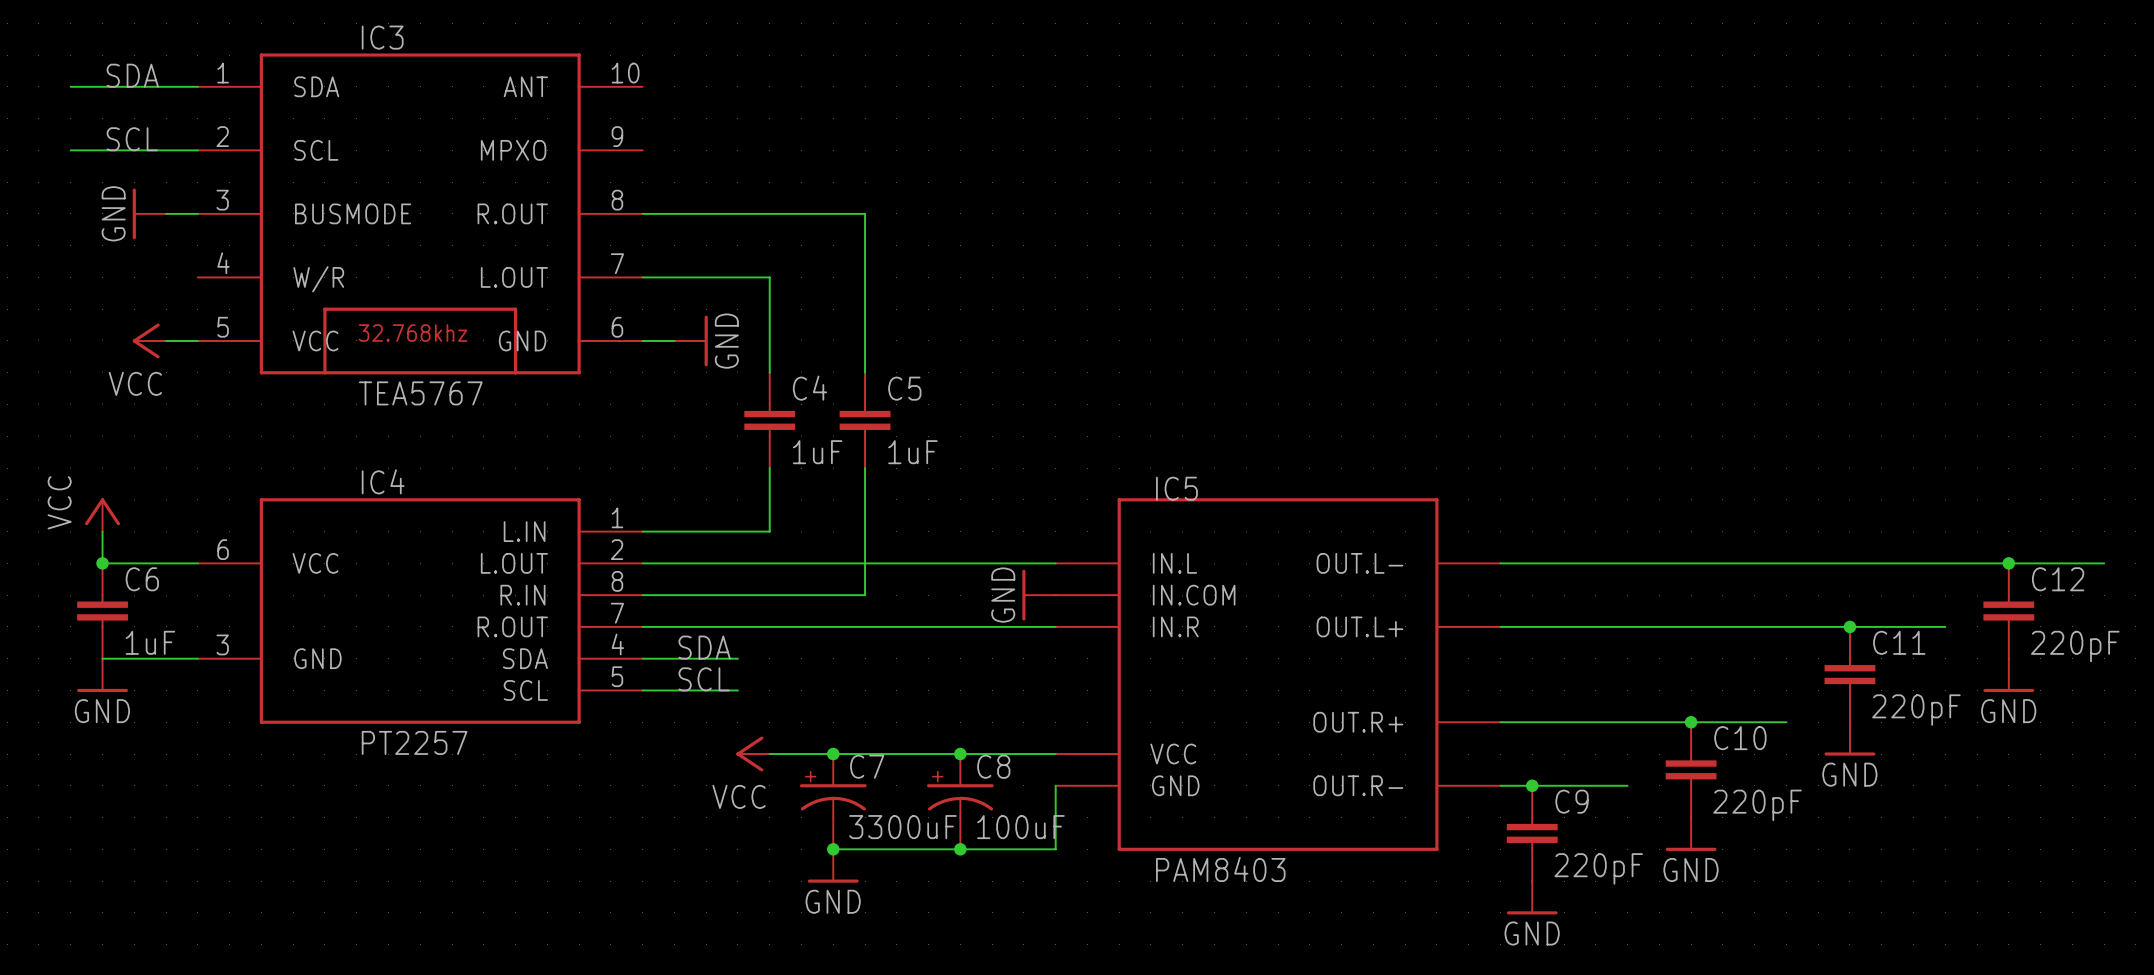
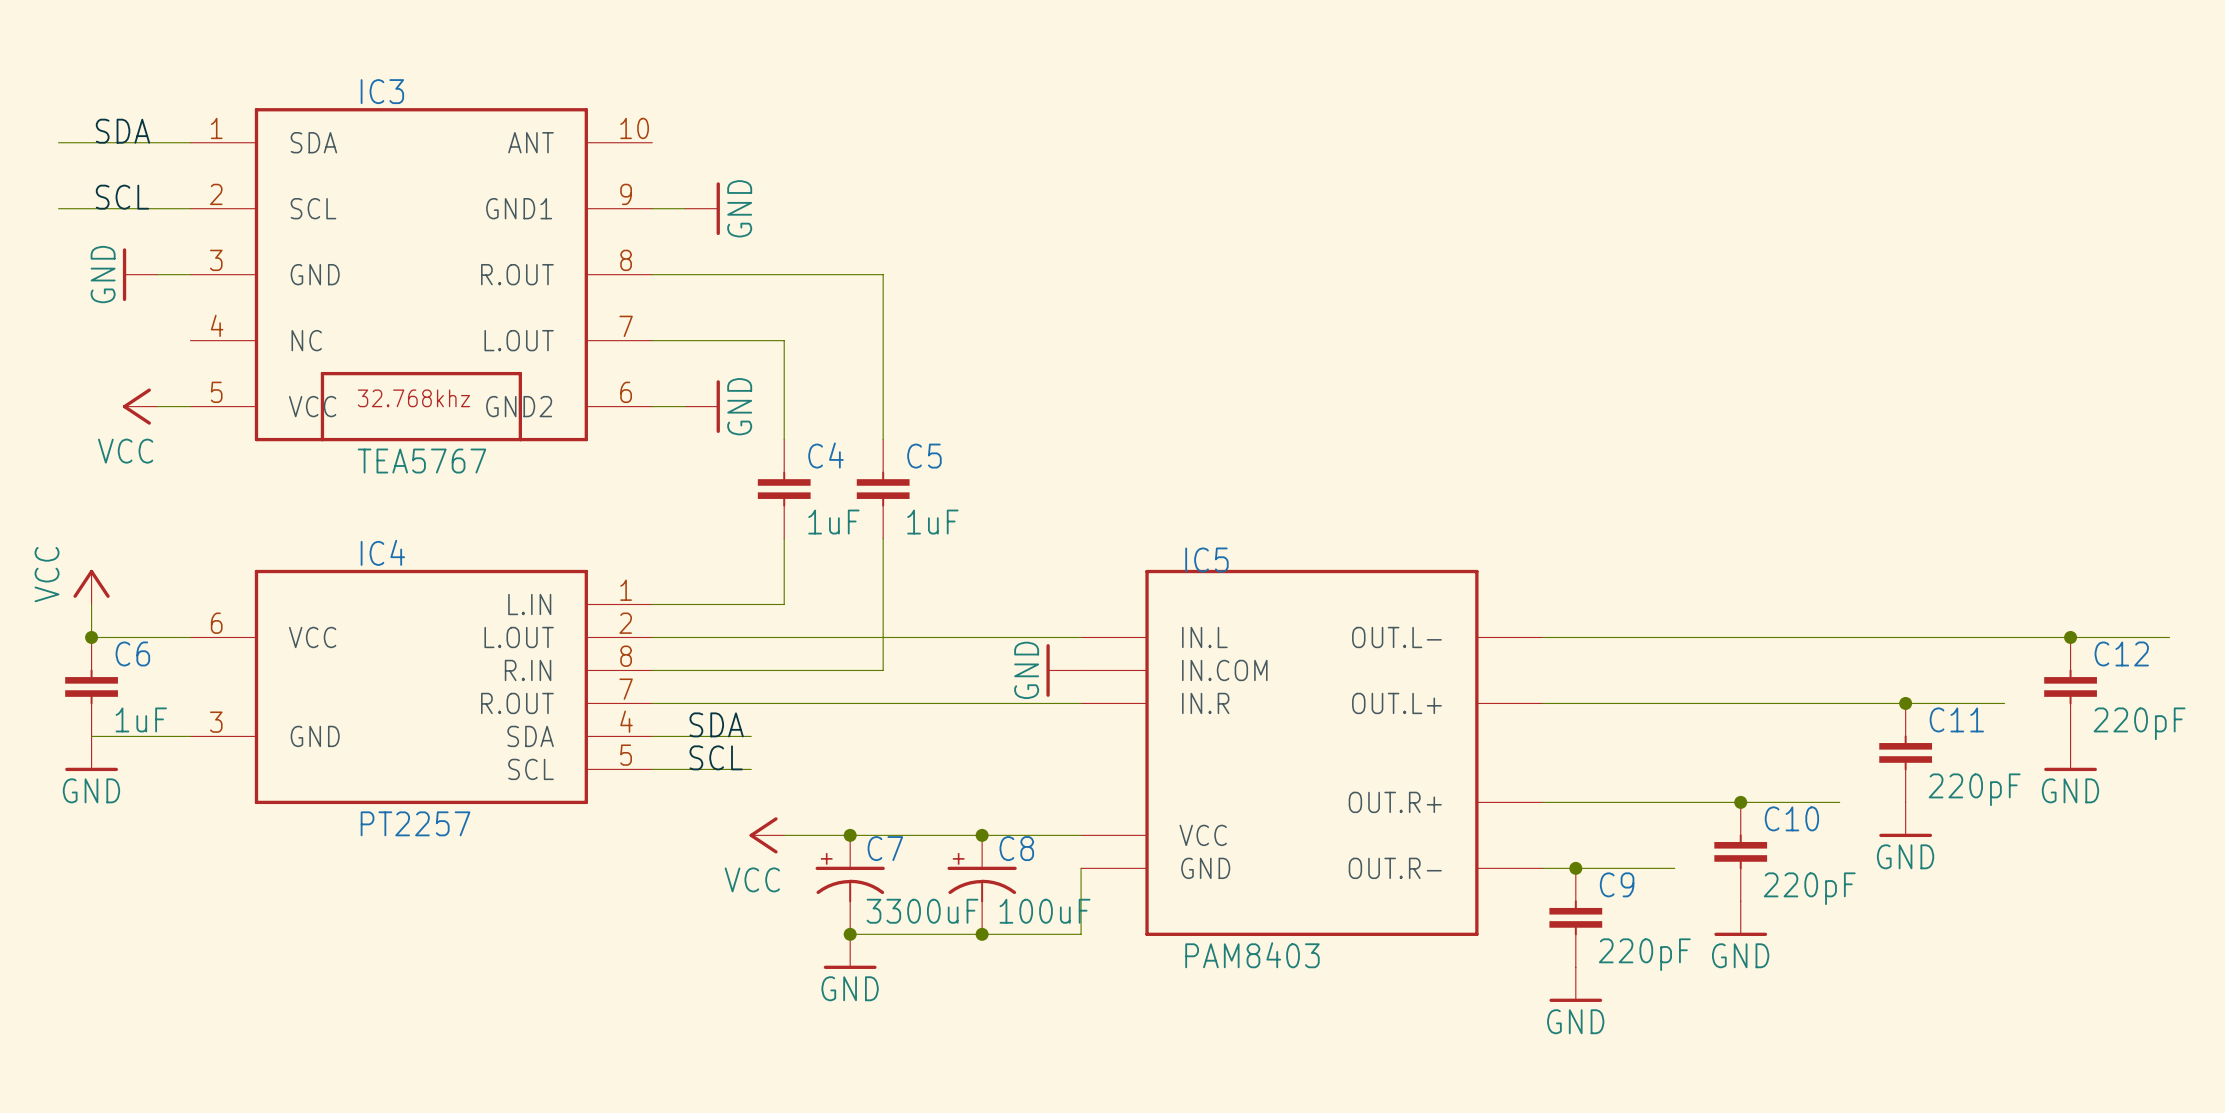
IC3 pin name: MPXO (513, 150) -> GND1 (519, 208)
wire: none -> (652, 208) (685, 208)
power symbol: none -> GND (702, 208)
IC3 pin name: BUSMODE (353, 213) -> GND (315, 274)
IC3 pin name: W/R (318, 279) -> NC (306, 340)
IC3 pin name: GND (522, 340) -> GND2 (519, 406)

